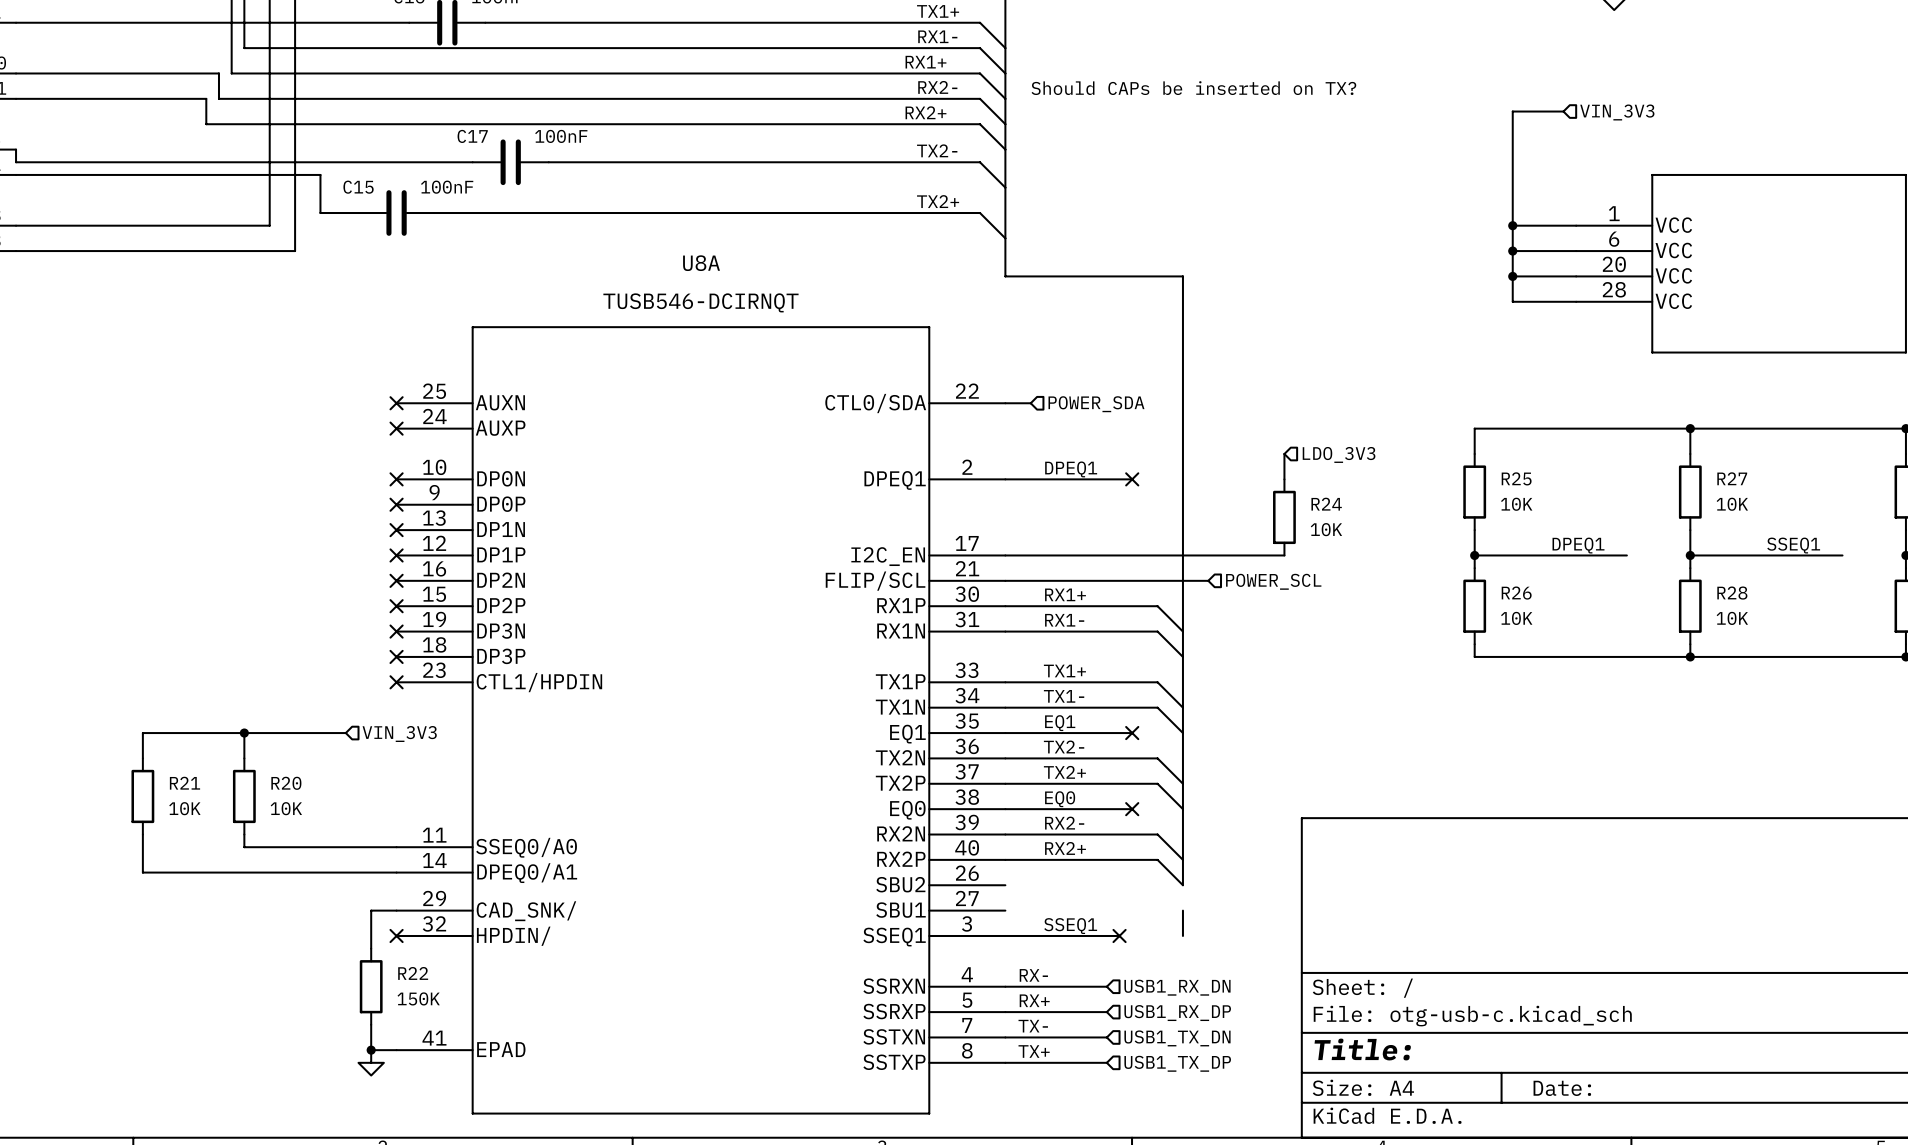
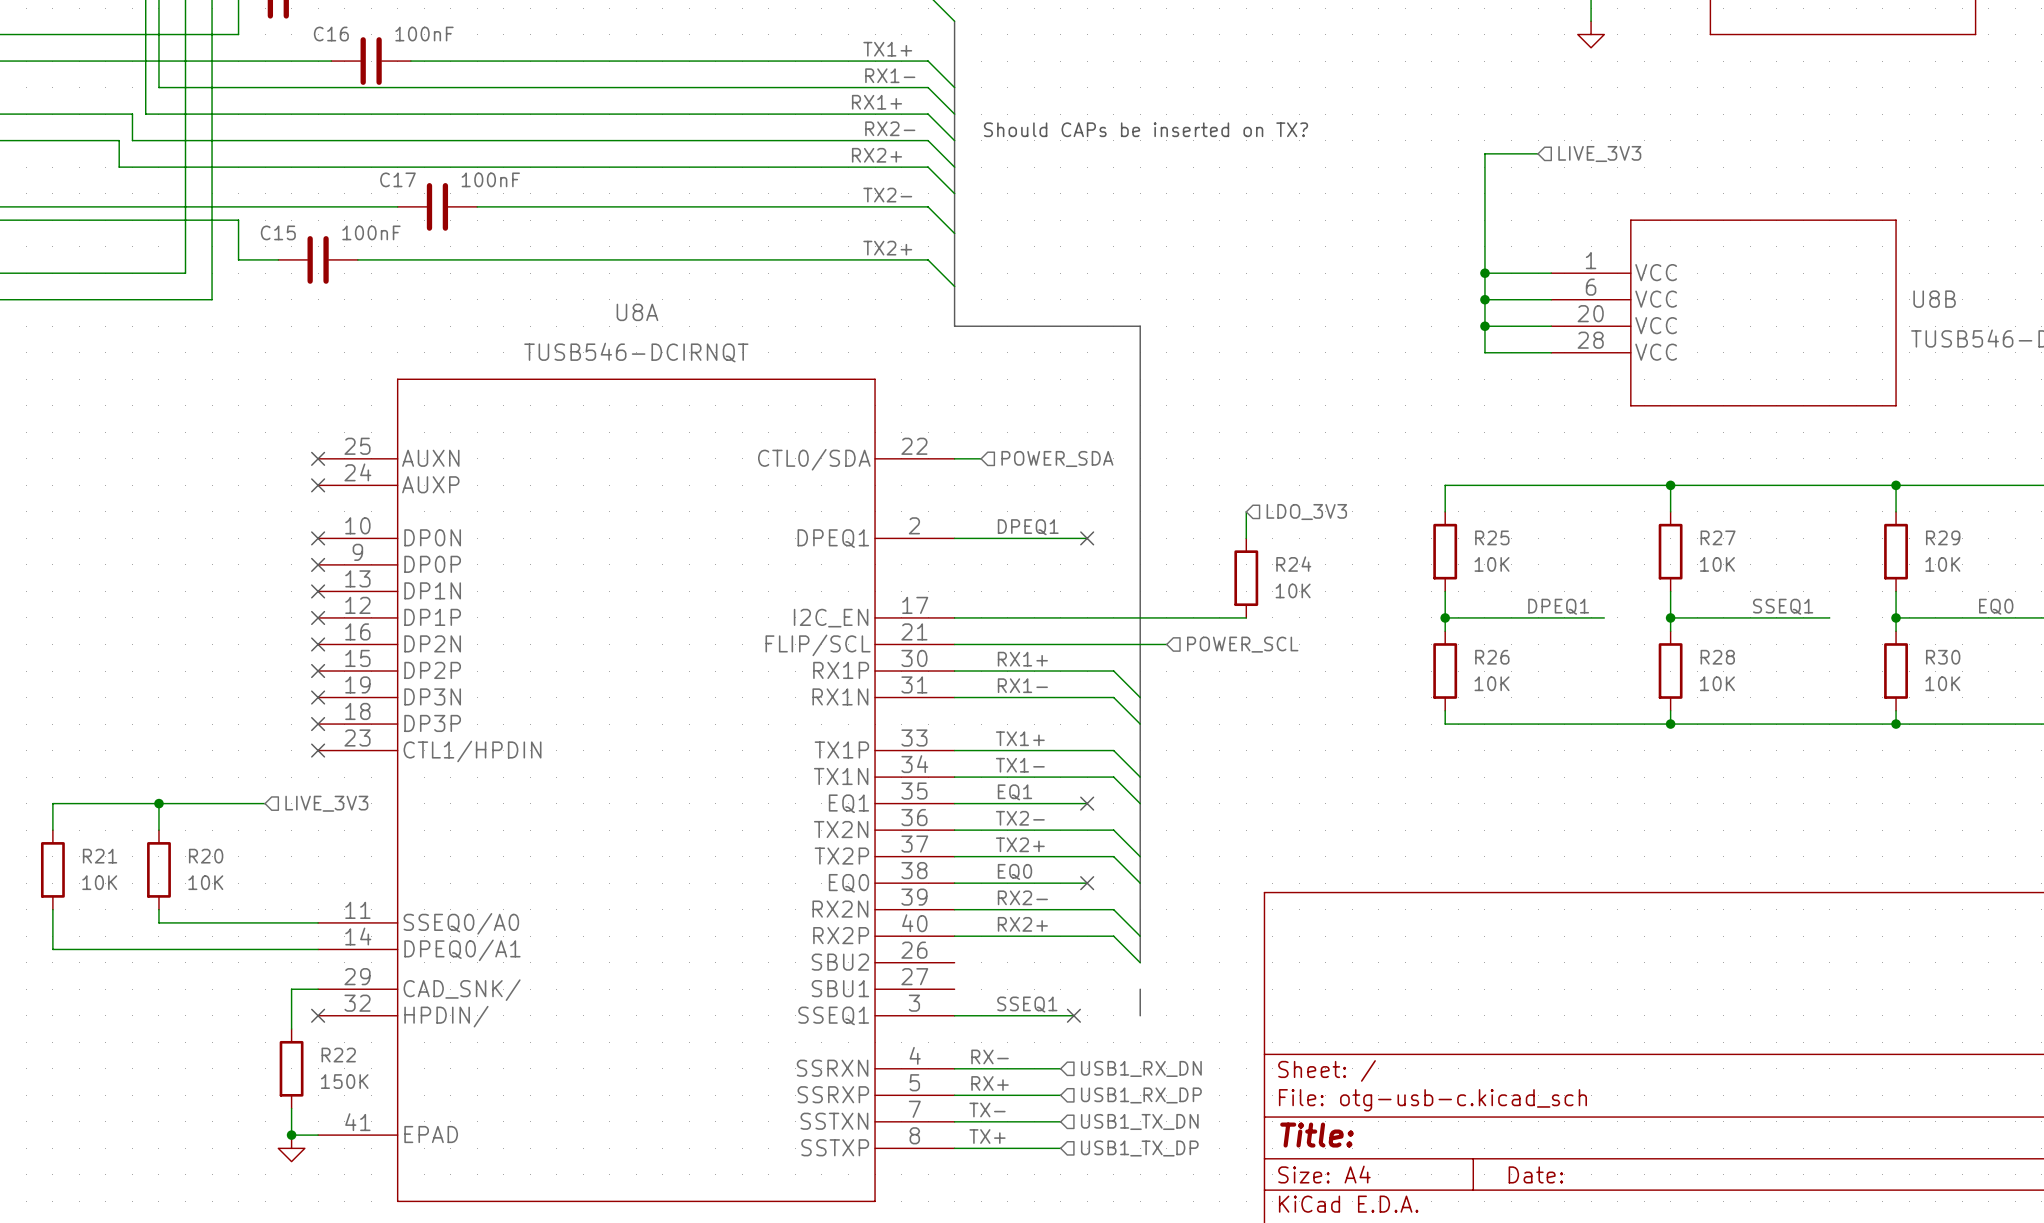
hierarchical label: VIN_3V3 (1617, 112) -> LIVE_3V3 (1599, 154)
hierarchical label: VIN_3V3 (399, 734) -> LIVE_3V3 (326, 803)

